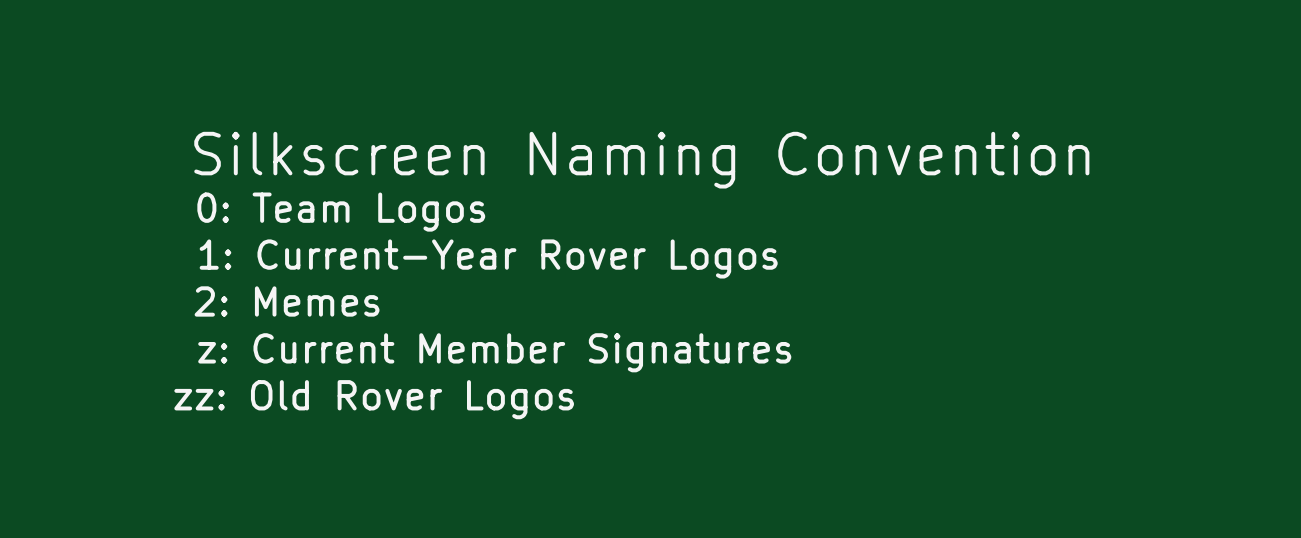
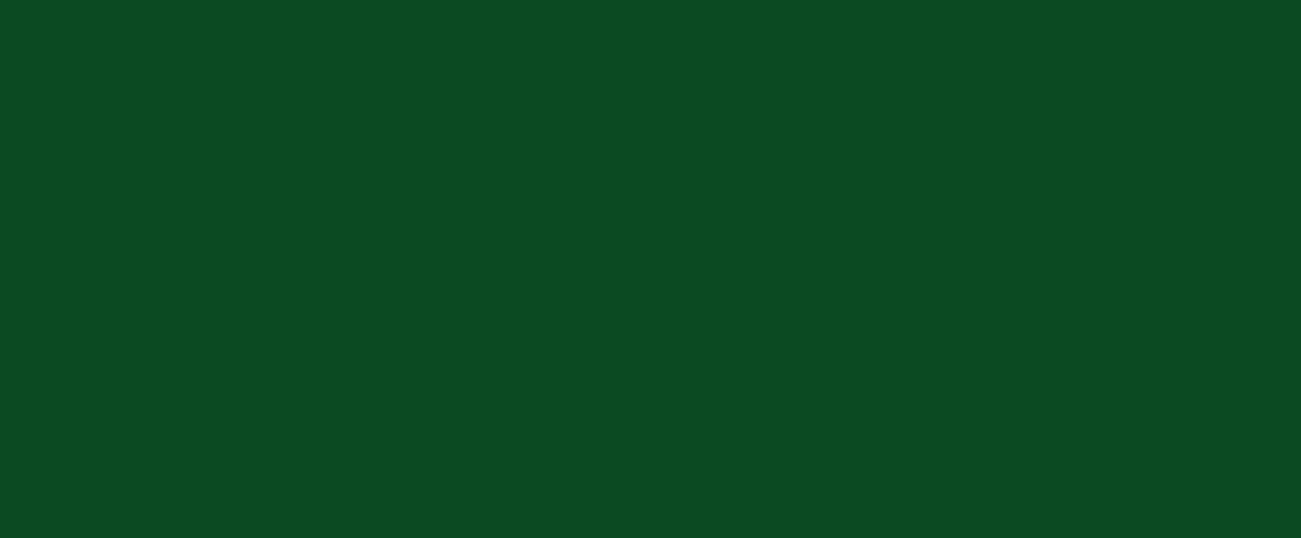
drawing: [174, 131, 1090, 420] -> none

